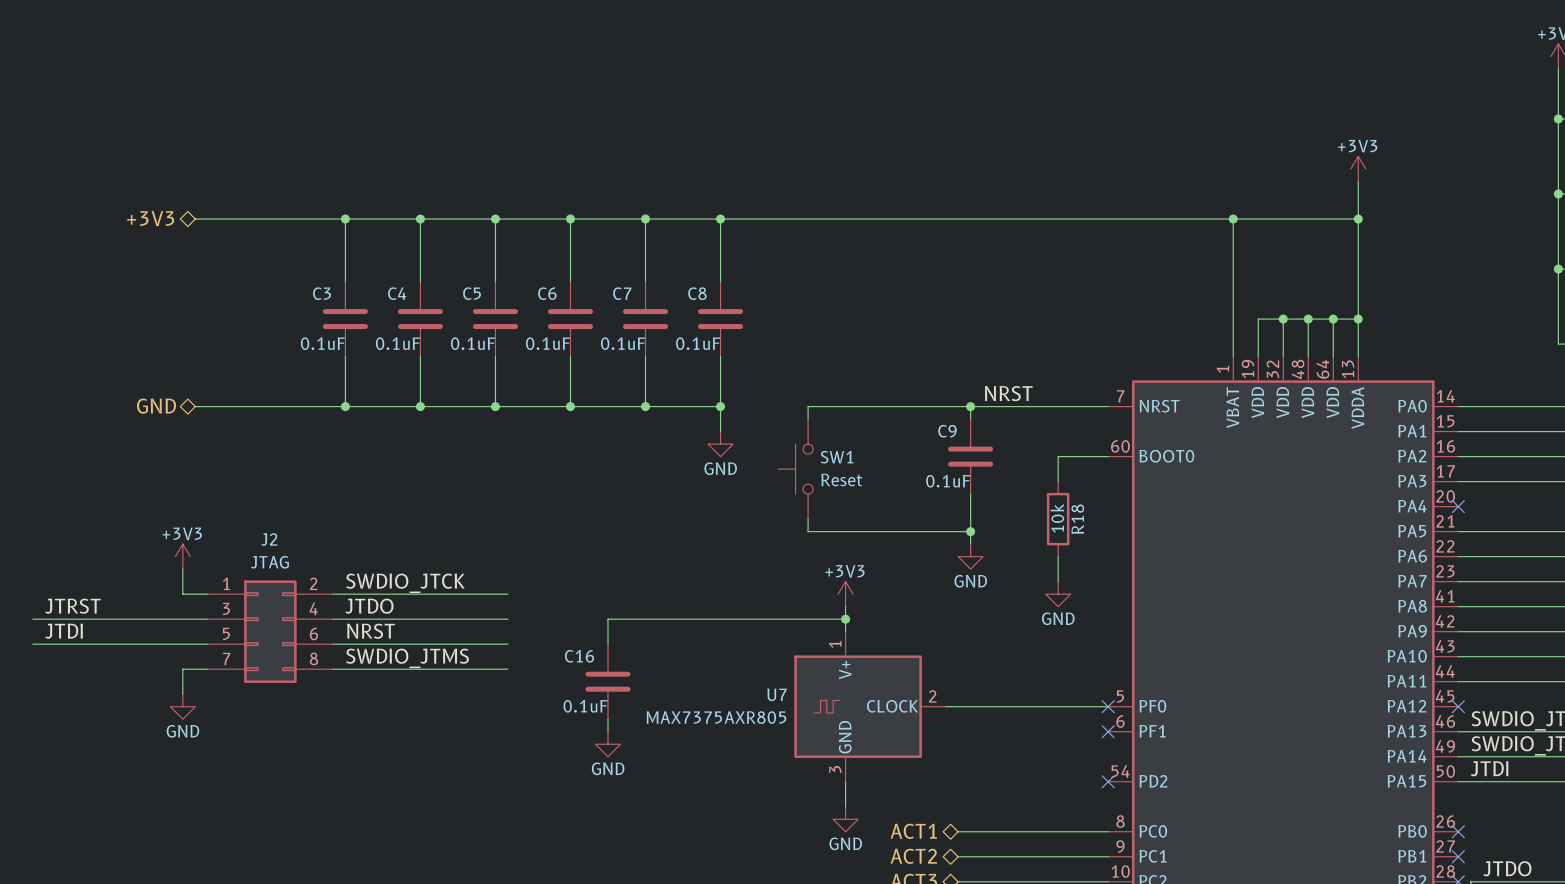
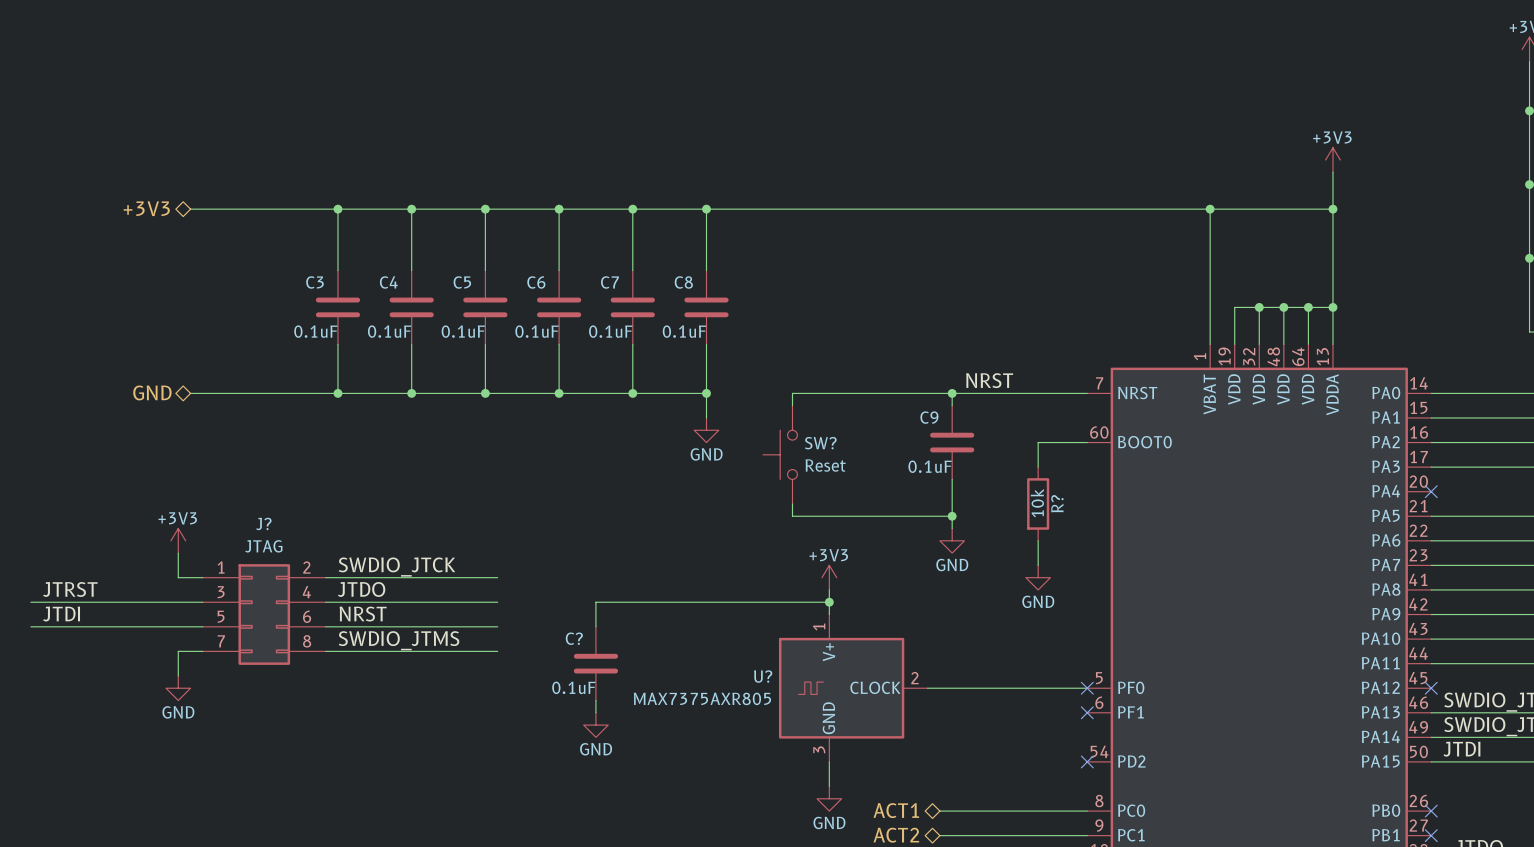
SW1 name: SW1 (837, 457) -> SW? (820, 443)
R18 name: R18 (1077, 519) -> R? (1057, 503)
J2 name: J2 (269, 539) -> J? (263, 523)
C16 name: C16 (579, 656) -> C? (574, 638)
U7 name: U7 (777, 694) -> U? (763, 676)

